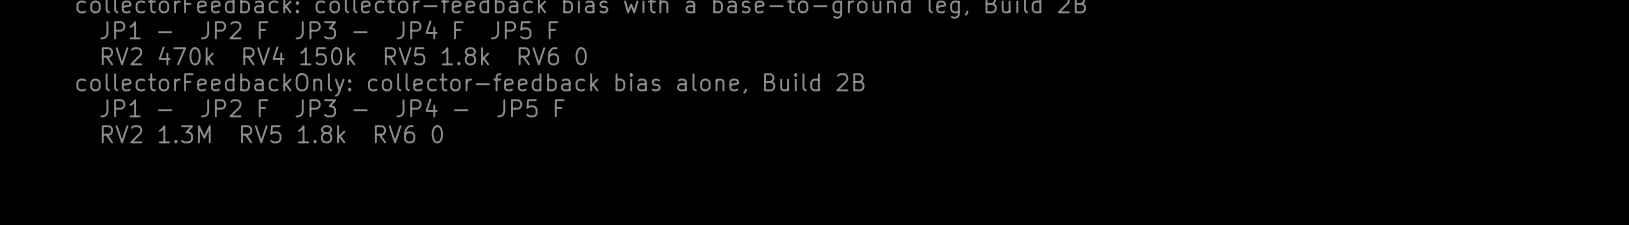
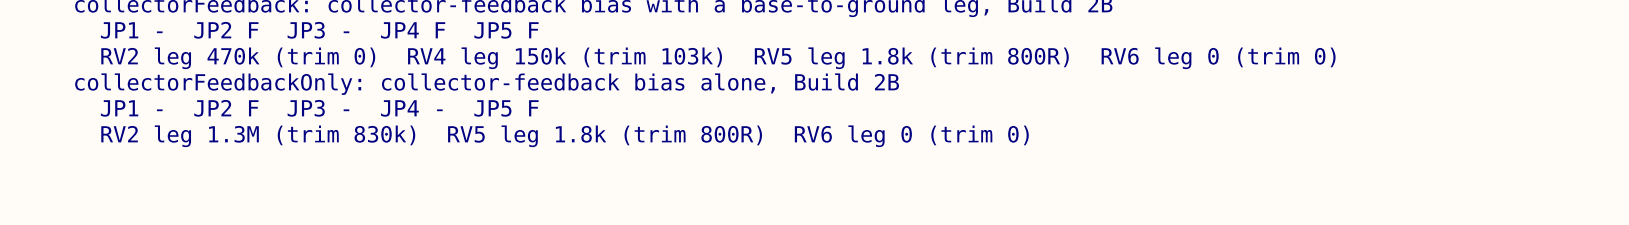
text: RV2 470k RV4 150k RV5 1.8k RV6 0 (344, 55) -> RV2 leg 470k (trim 0) RV4 leg 150k (trim 103k) RV5 leg 1.8k (trim 800R) RV6 leg 0 (trim 0) (718, 58)
text: RV2 1.3M RV5 1.8k RV6 0 (272, 134) -> RV2 leg 1.3M (trim 830k) RV5 leg 1.8k (trim 800R) RV6 leg 0 (trim 0) (565, 136)

